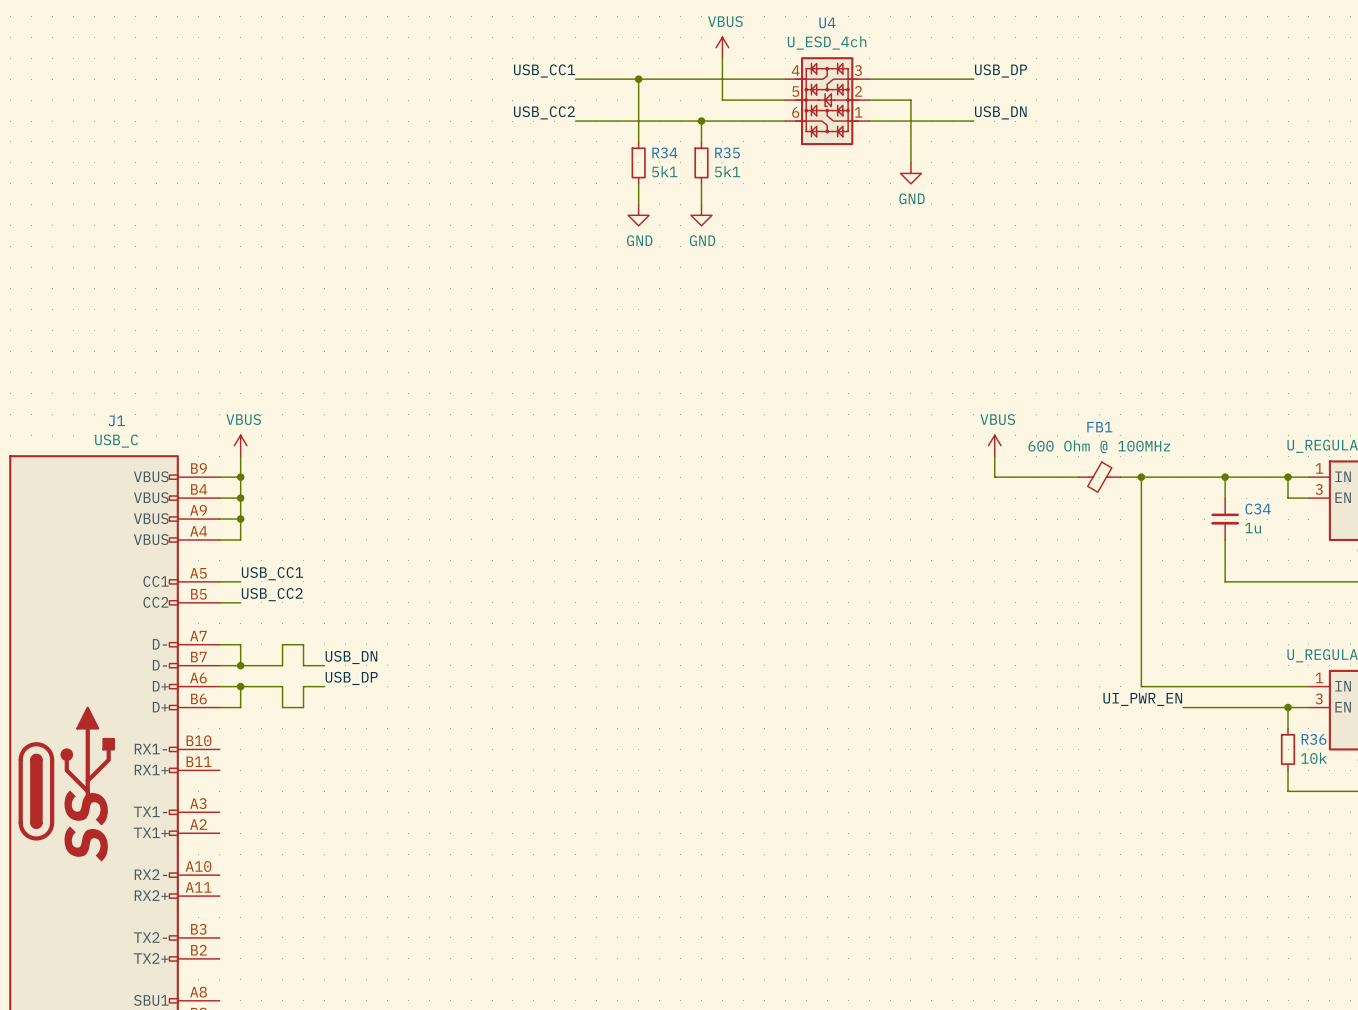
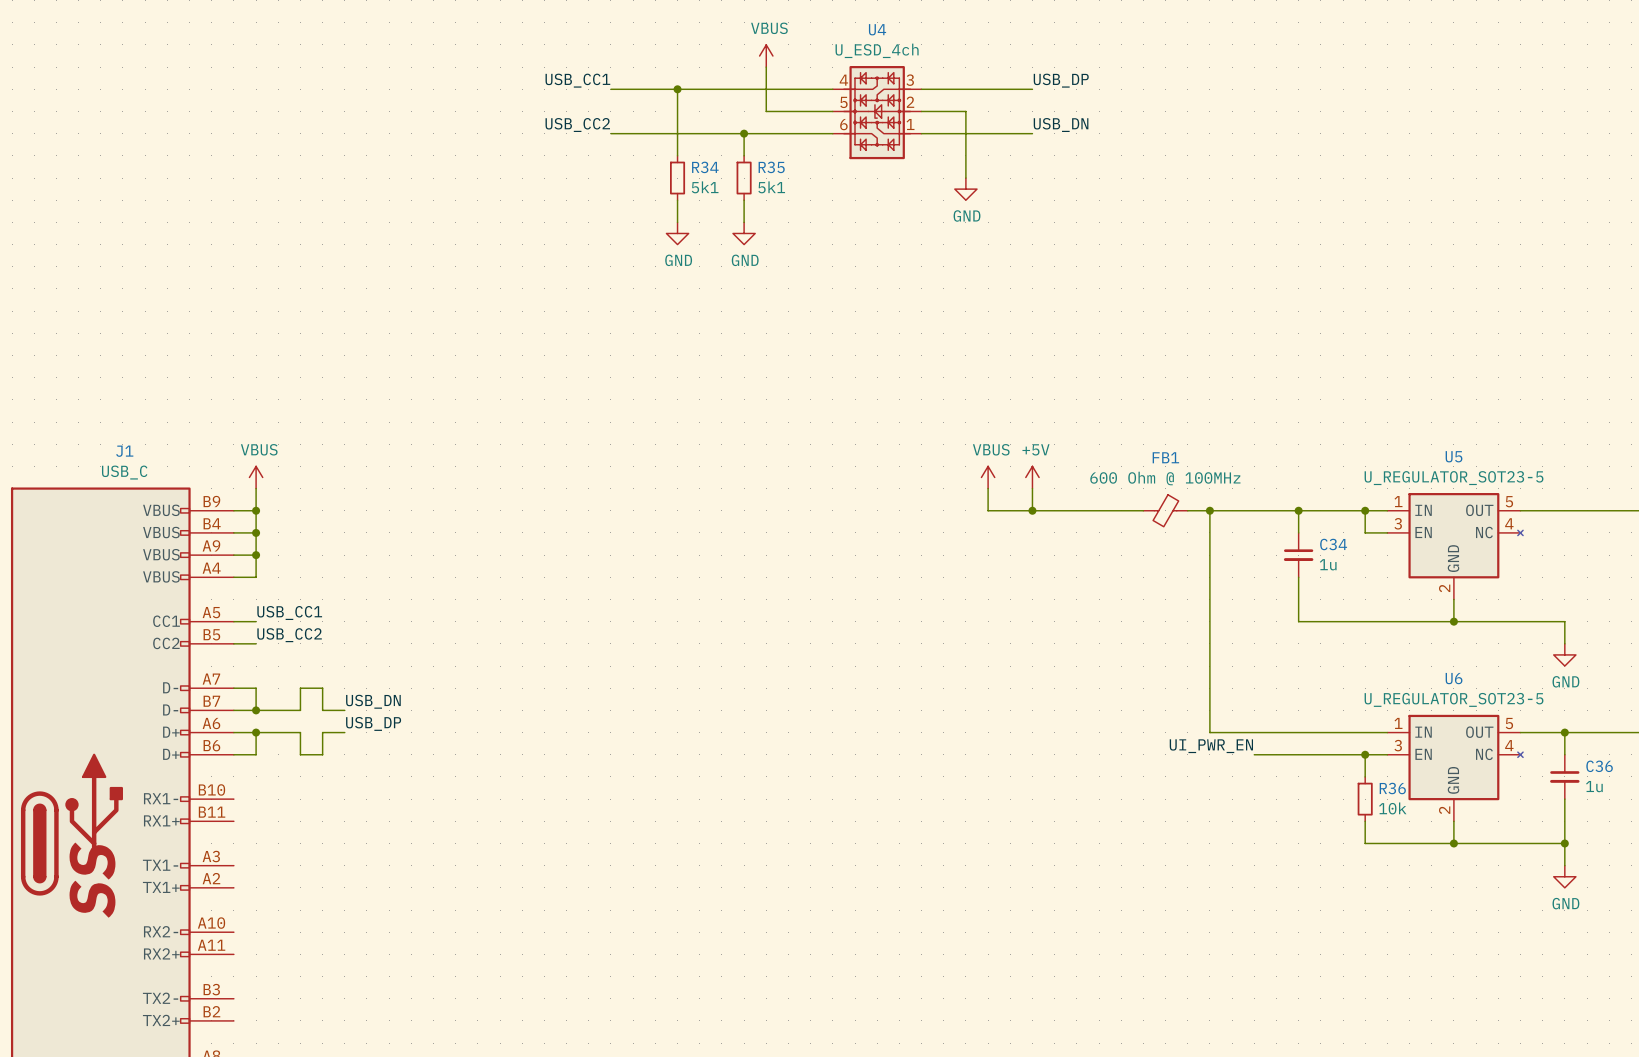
power symbol: none -> +5V (1032, 477)
power symbol position: VBUS (994, 445) -> VBUS (988, 477)
wire: none -> (1032, 488) (1032, 510)
wire: (994, 456) (994, 477) -> (988, 488) (988, 510) (1054, 510)
junction: none -> (1032, 510)

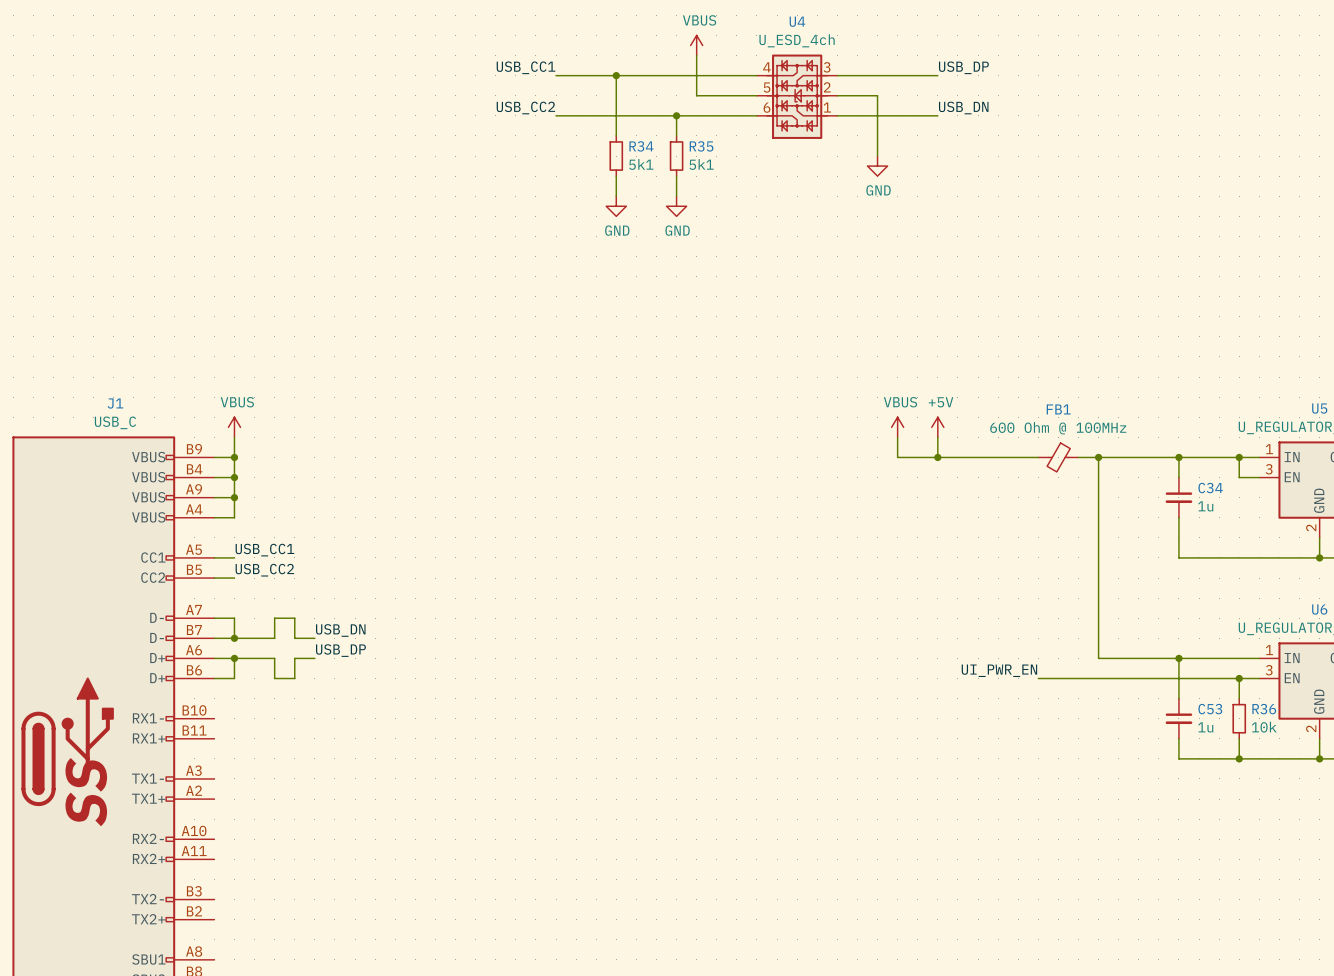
wire: none -> (1178, 658) (1178, 698)
junction: none -> (1178, 658)
label position: UI_PWR_EN (1211, 746) -> UI_PWR_EN (999, 670)
wire: none -> (1038, 678) (1138, 678)
C53: none -> 1u (1178, 718)
wire: none -> (1178, 738) (1178, 758) (1239, 758)
junction: none -> (1239, 758)

